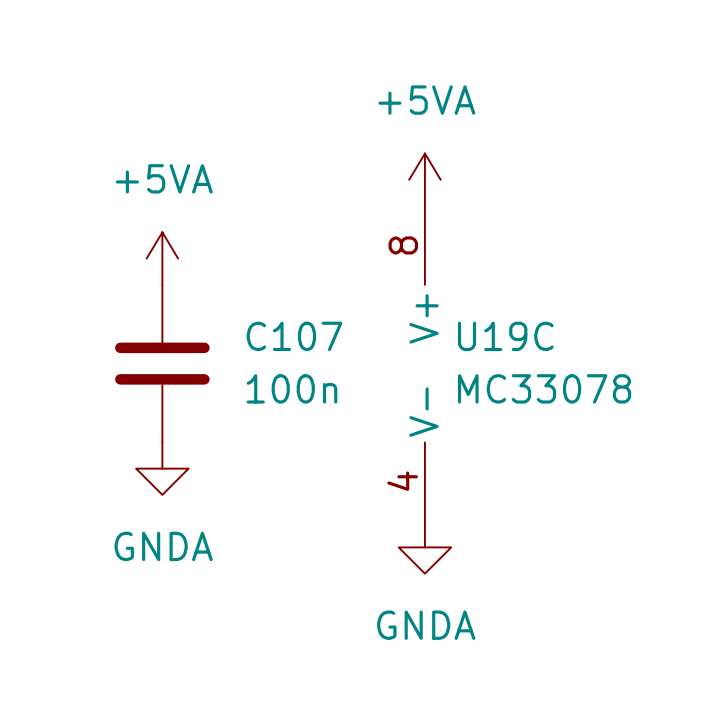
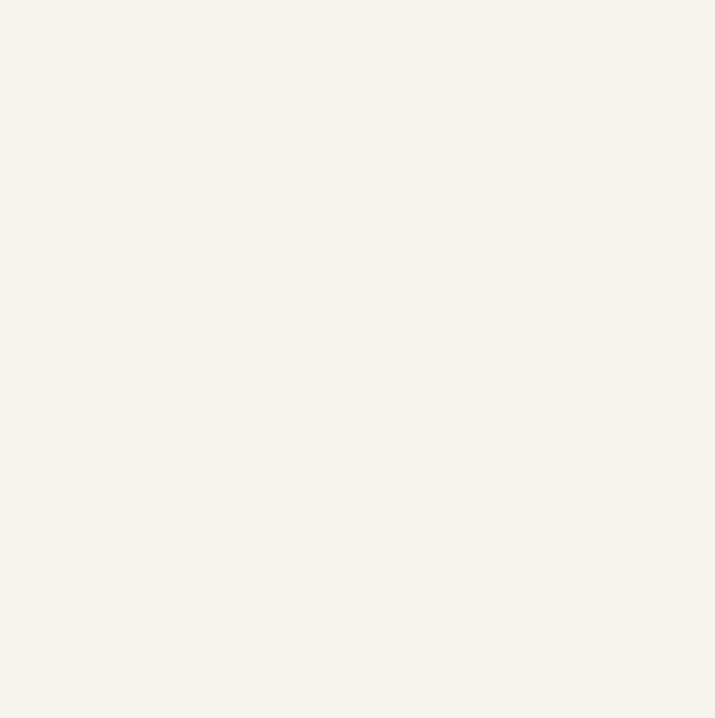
power symbol: +5VA (424, 179) -> none
power symbol: +5VA (162, 258) -> none
C107: 100n (162, 363) -> none
U19C: MC33078 (424, 363) -> none
power symbol: GNDA (162, 468) -> none
power symbol: GNDA (424, 547) -> none

